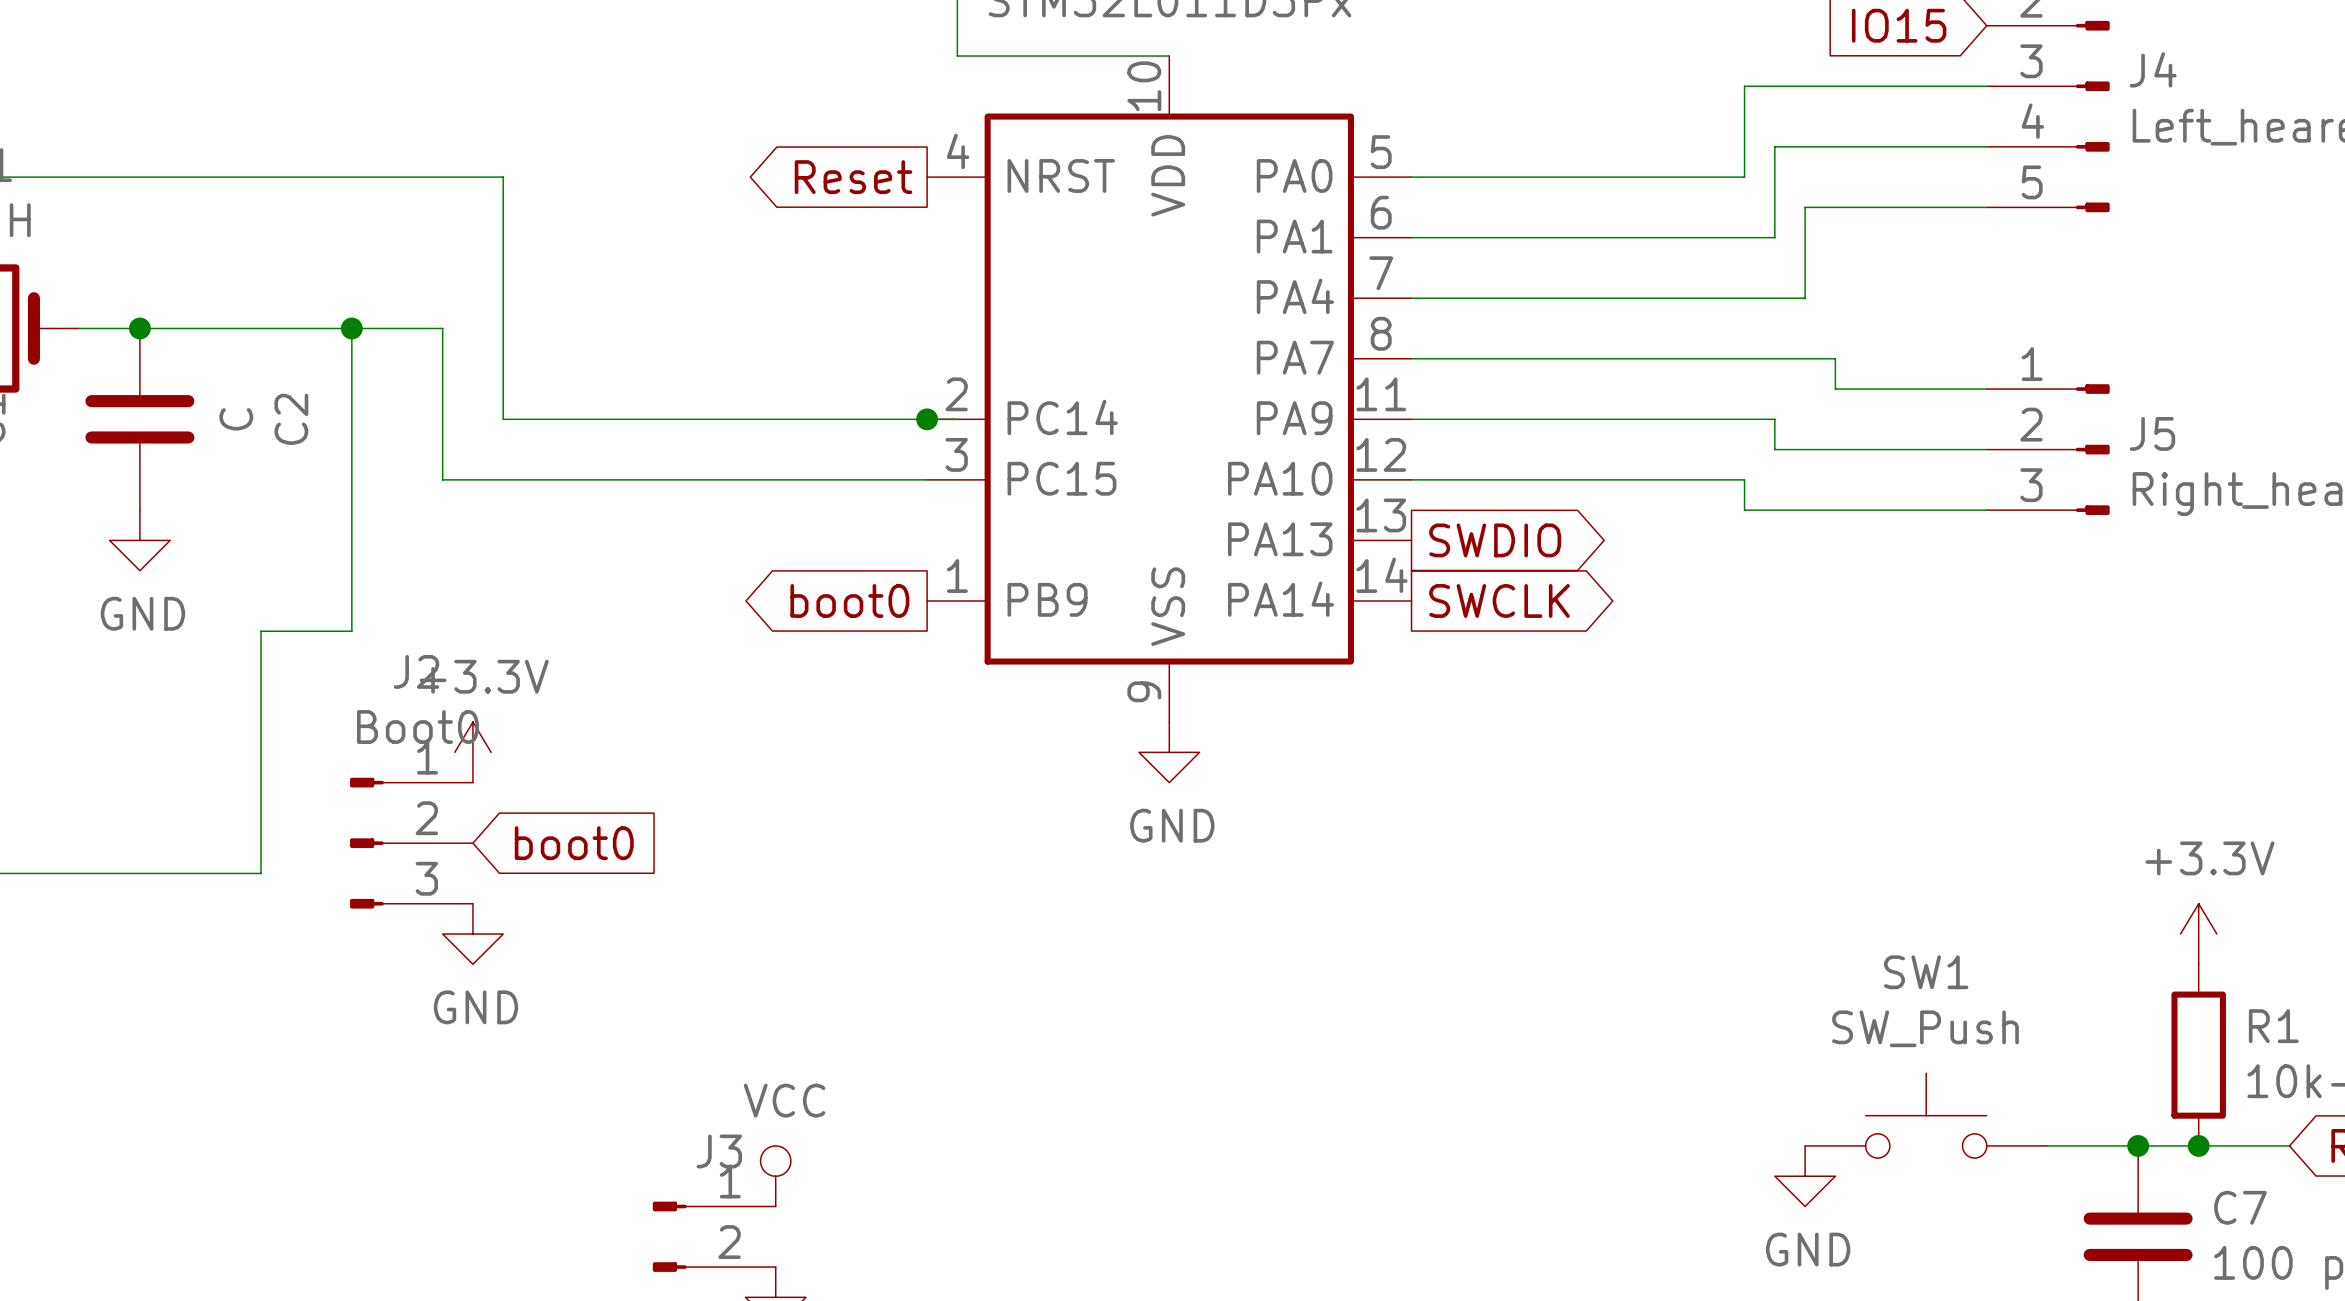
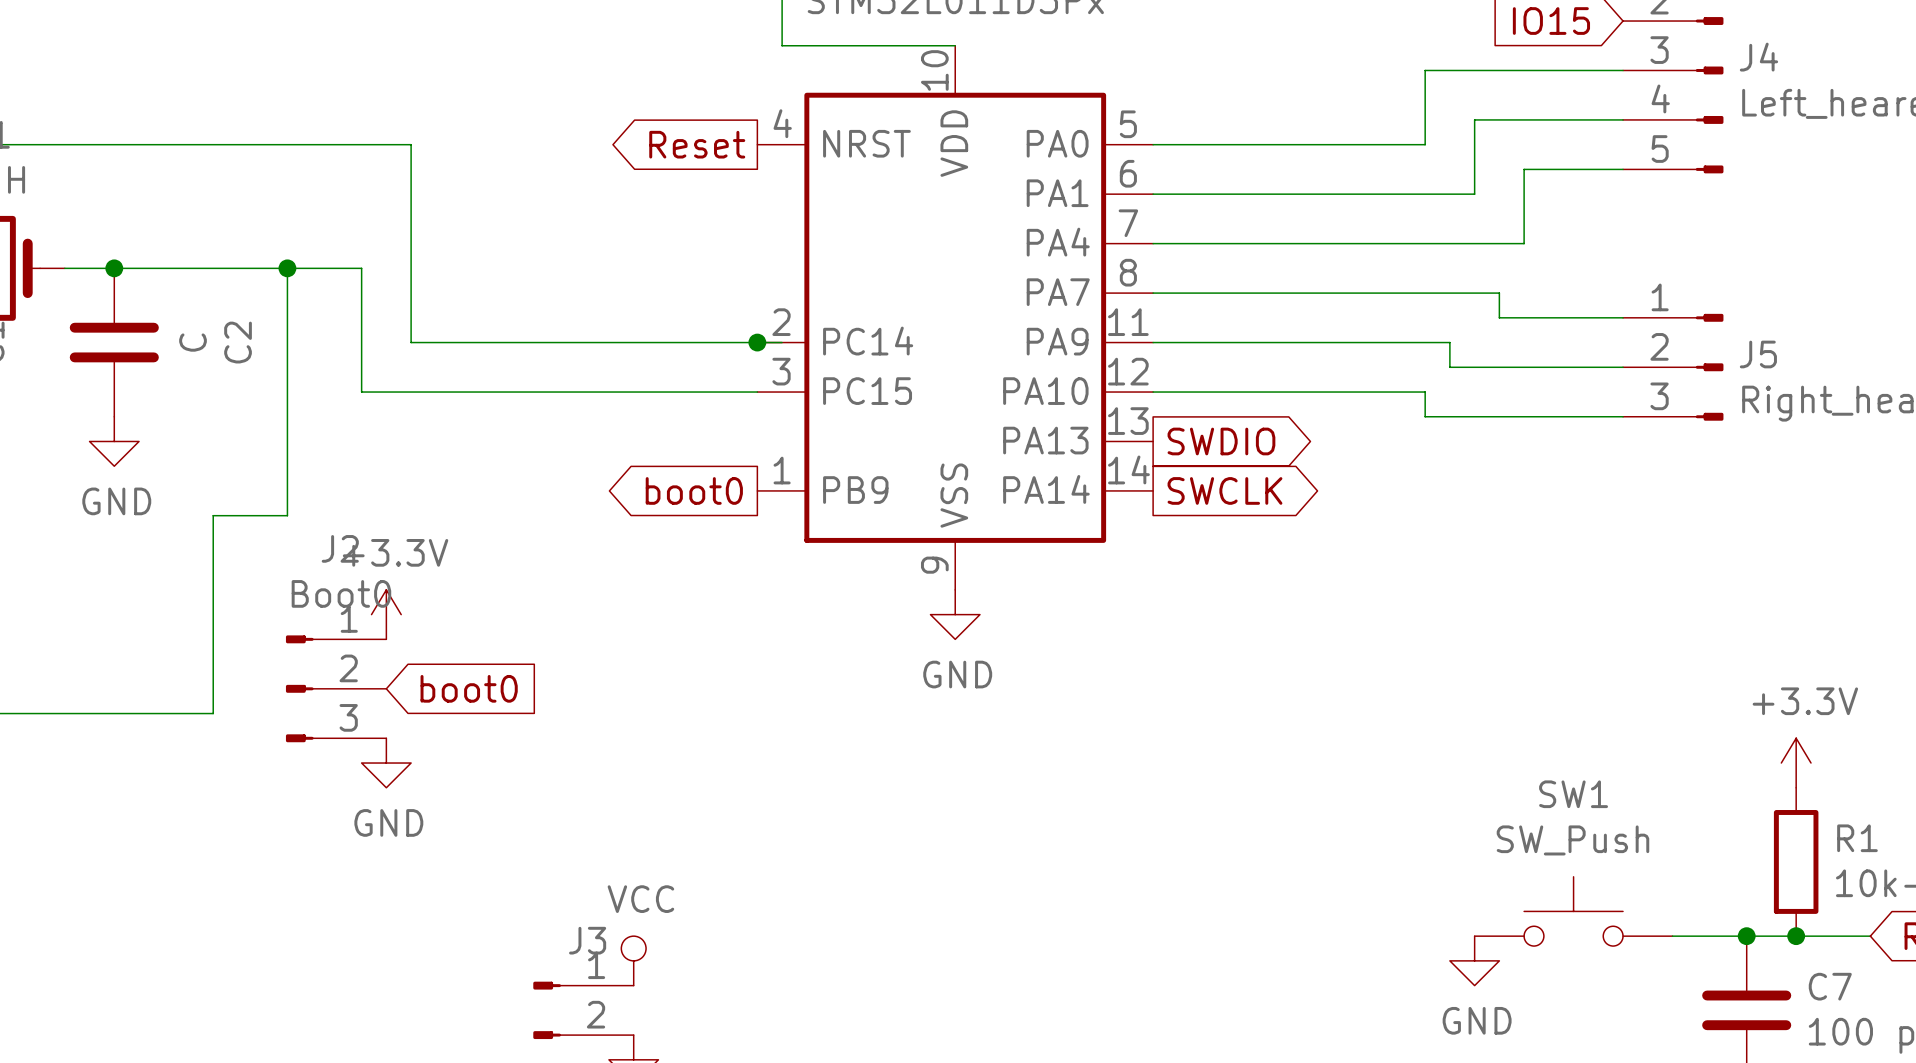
wire: (1805, 146) (1774, 146) (1774, 237) -> (1474, 119) (1474, 169)
wire: (1805, 207) (1865, 207) -> none
wire: none -> (1449, 194) (1474, 194)
wire: (1805, 237) (1805, 298) -> (1524, 169) (1524, 243) (1474, 243)

